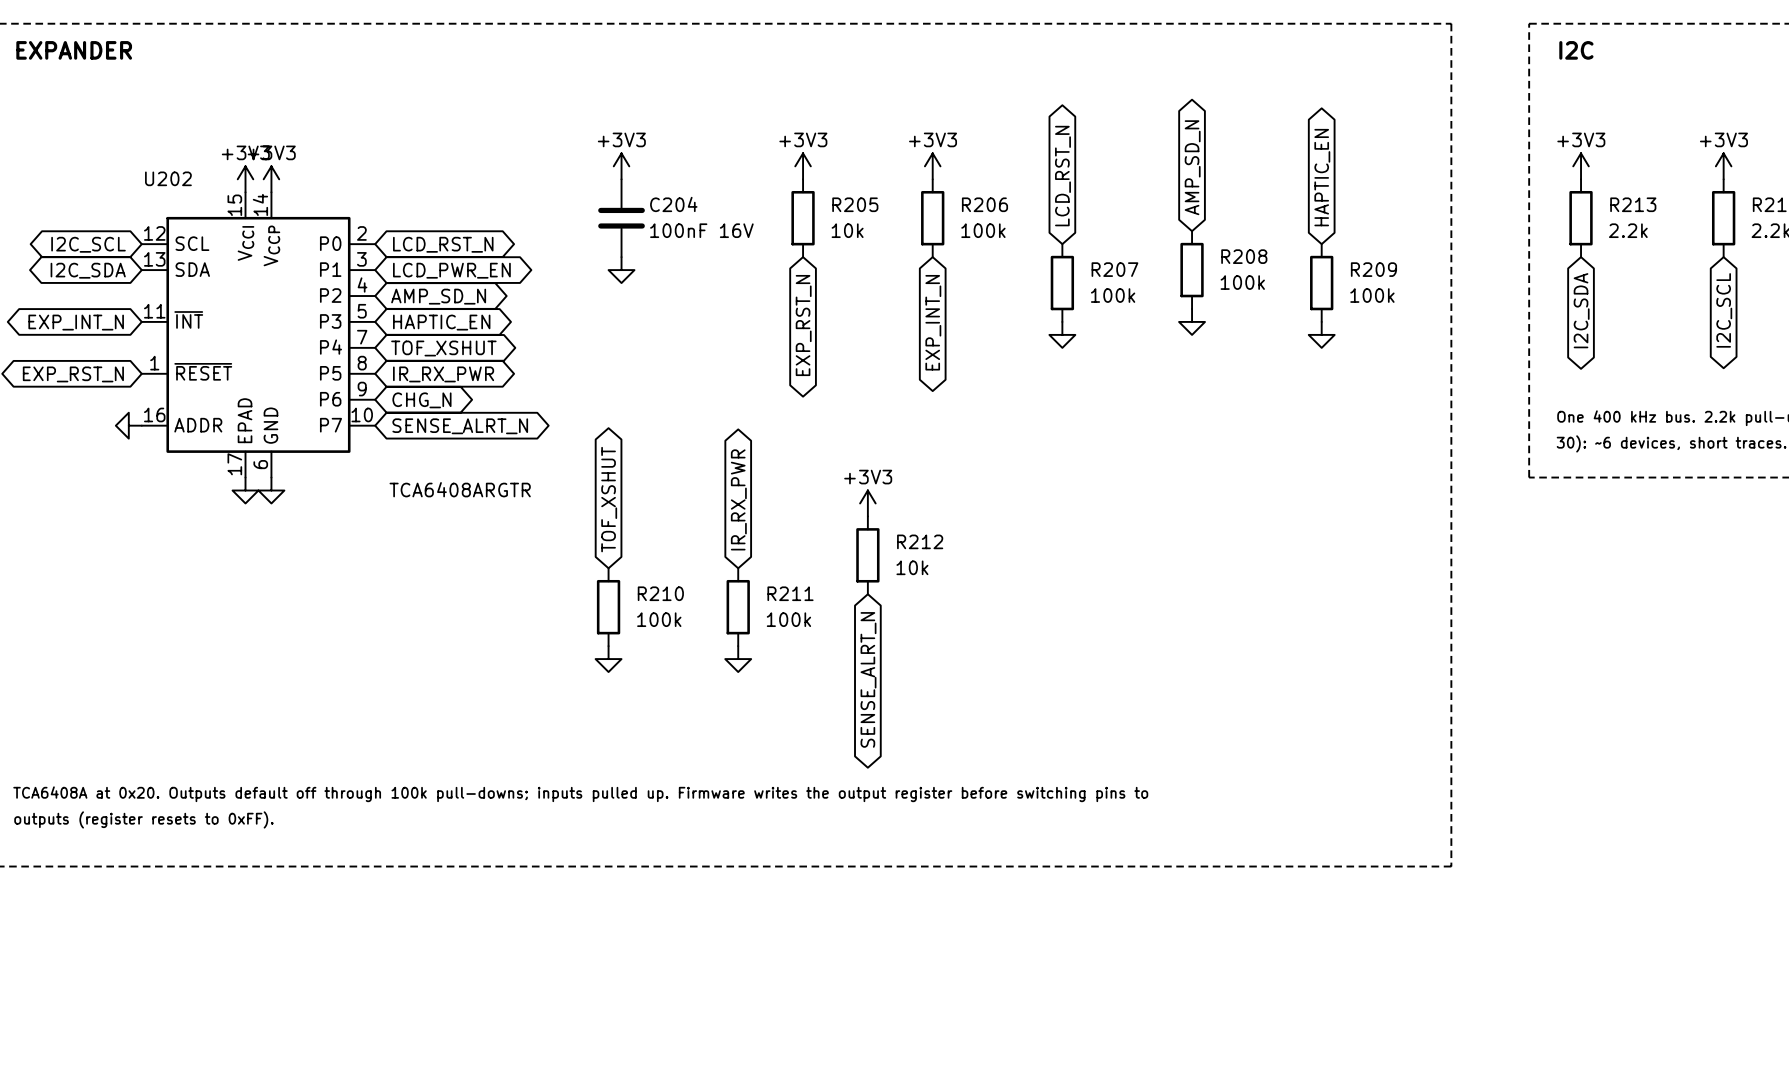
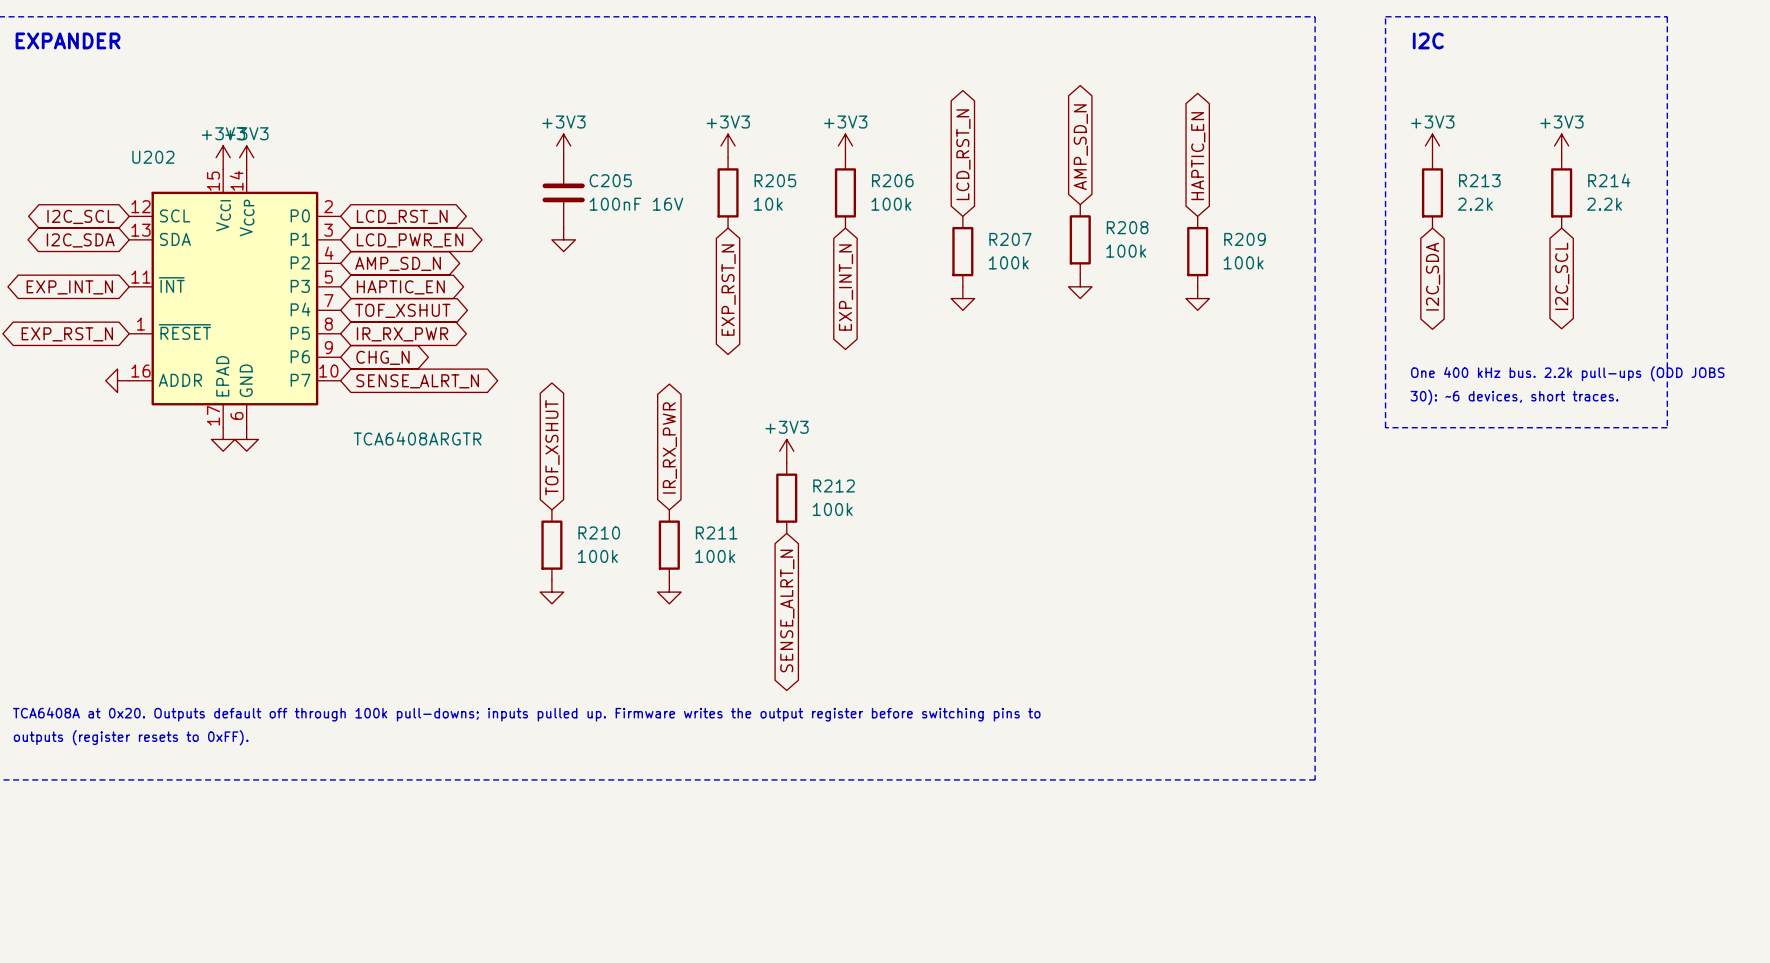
C204 name: C204 (673, 204) -> C205 (610, 180)
R212 value: 10k (912, 567) -> 100k (832, 509)

